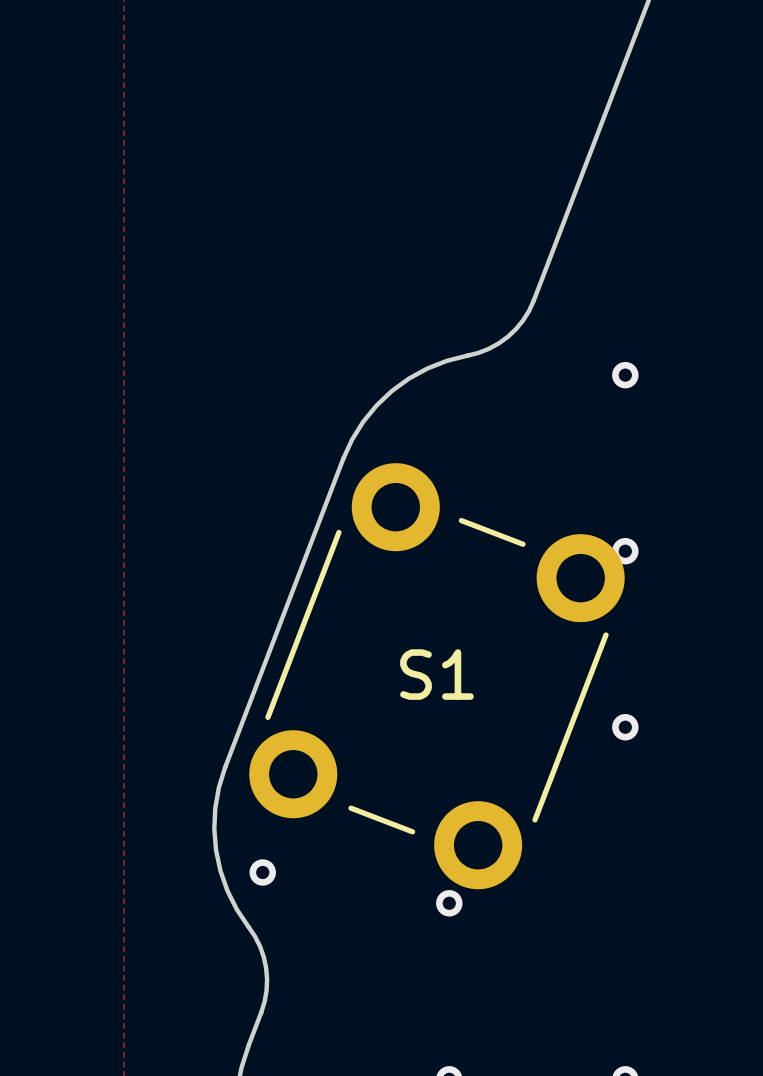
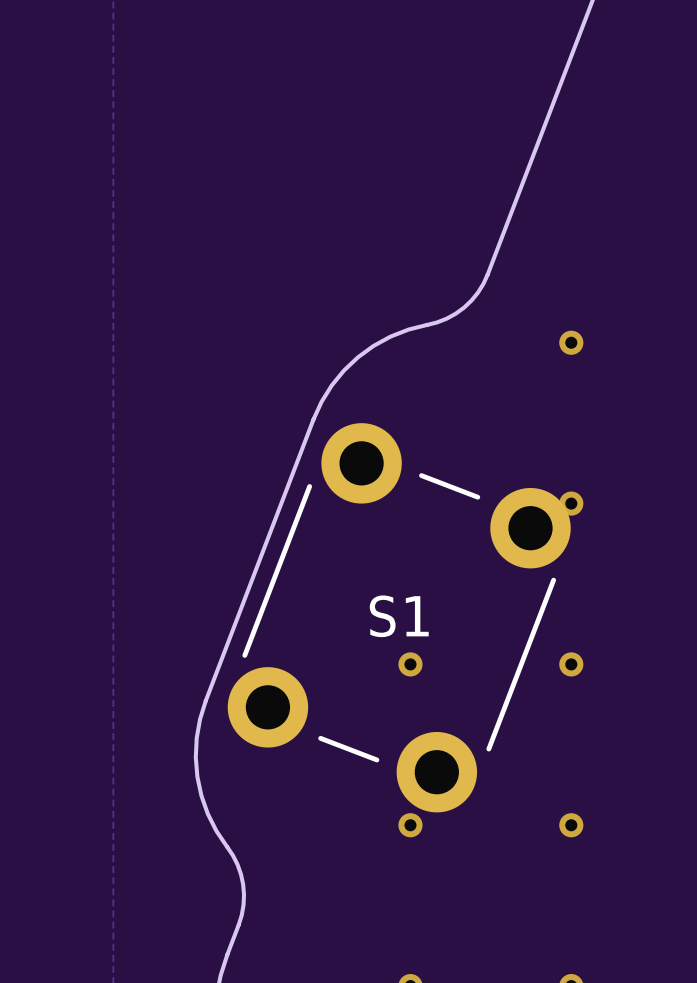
via: none -> (410, 664)
via: (262, 872) -> none
via: none -> (571, 825)

